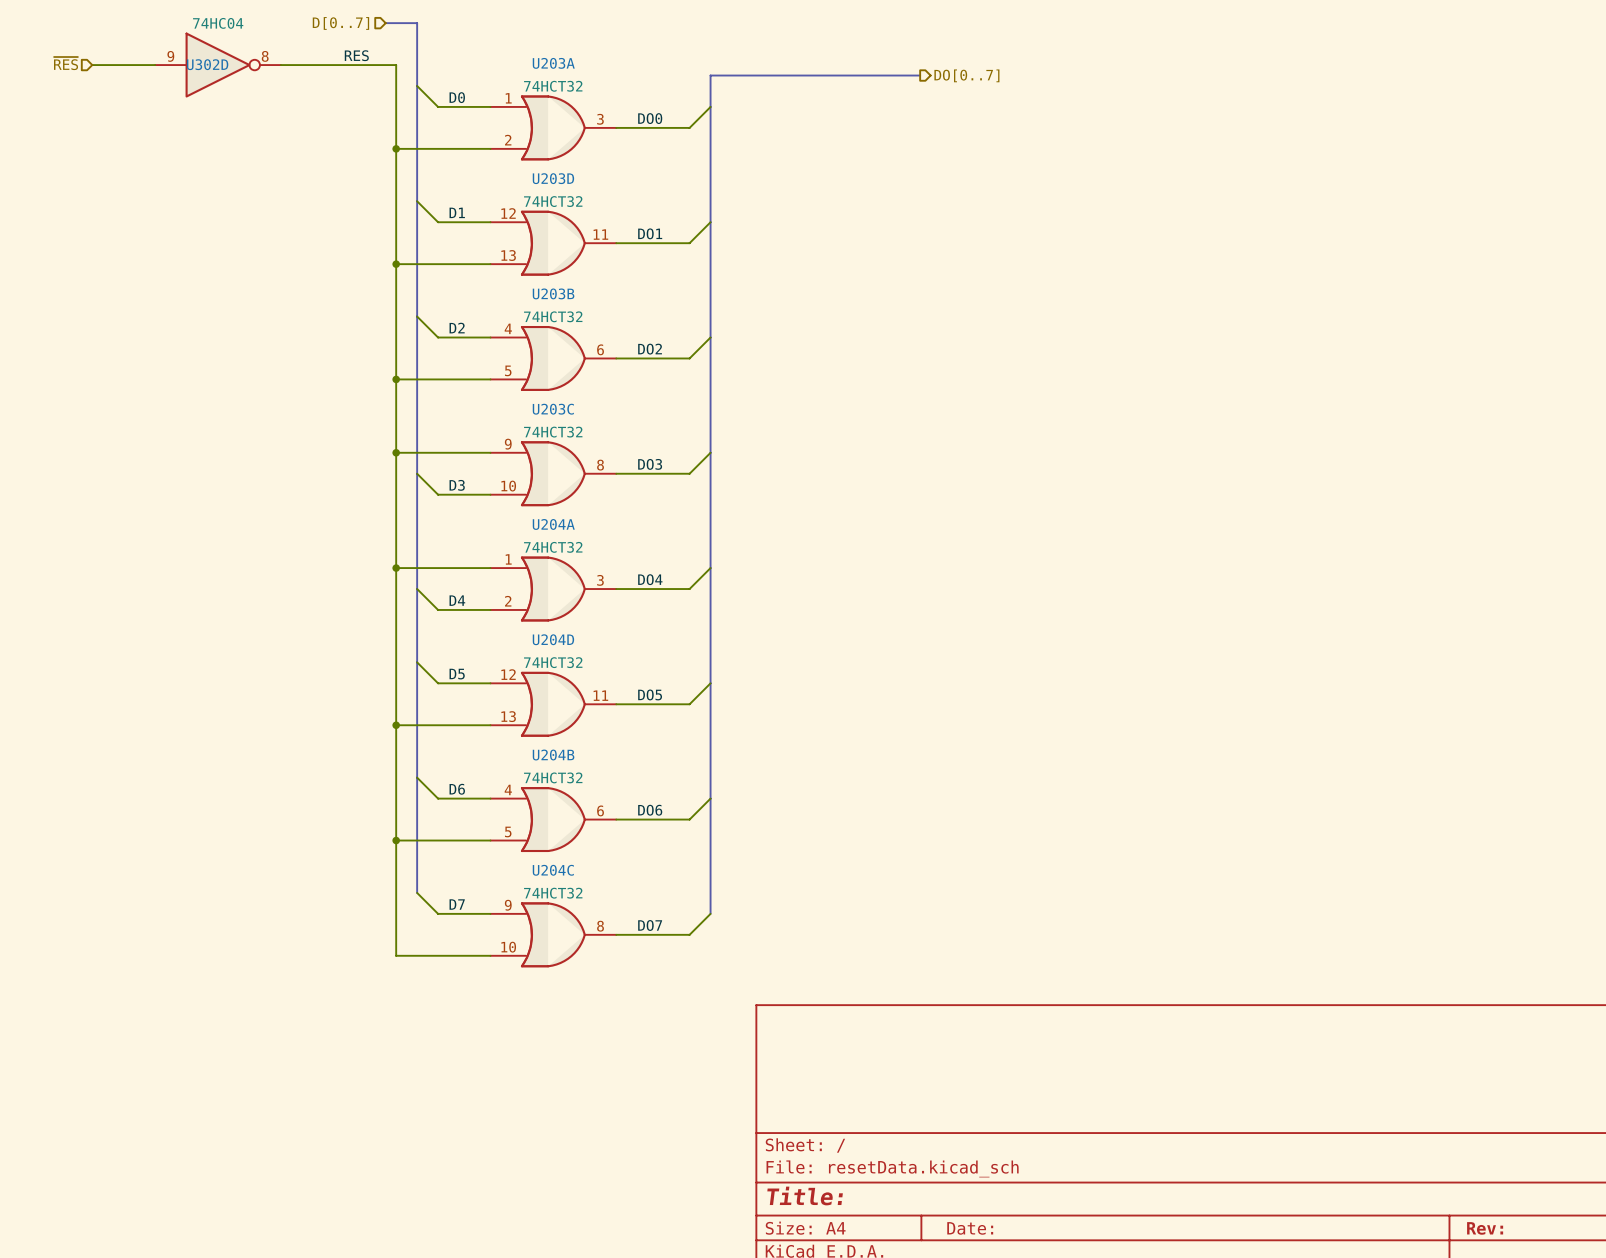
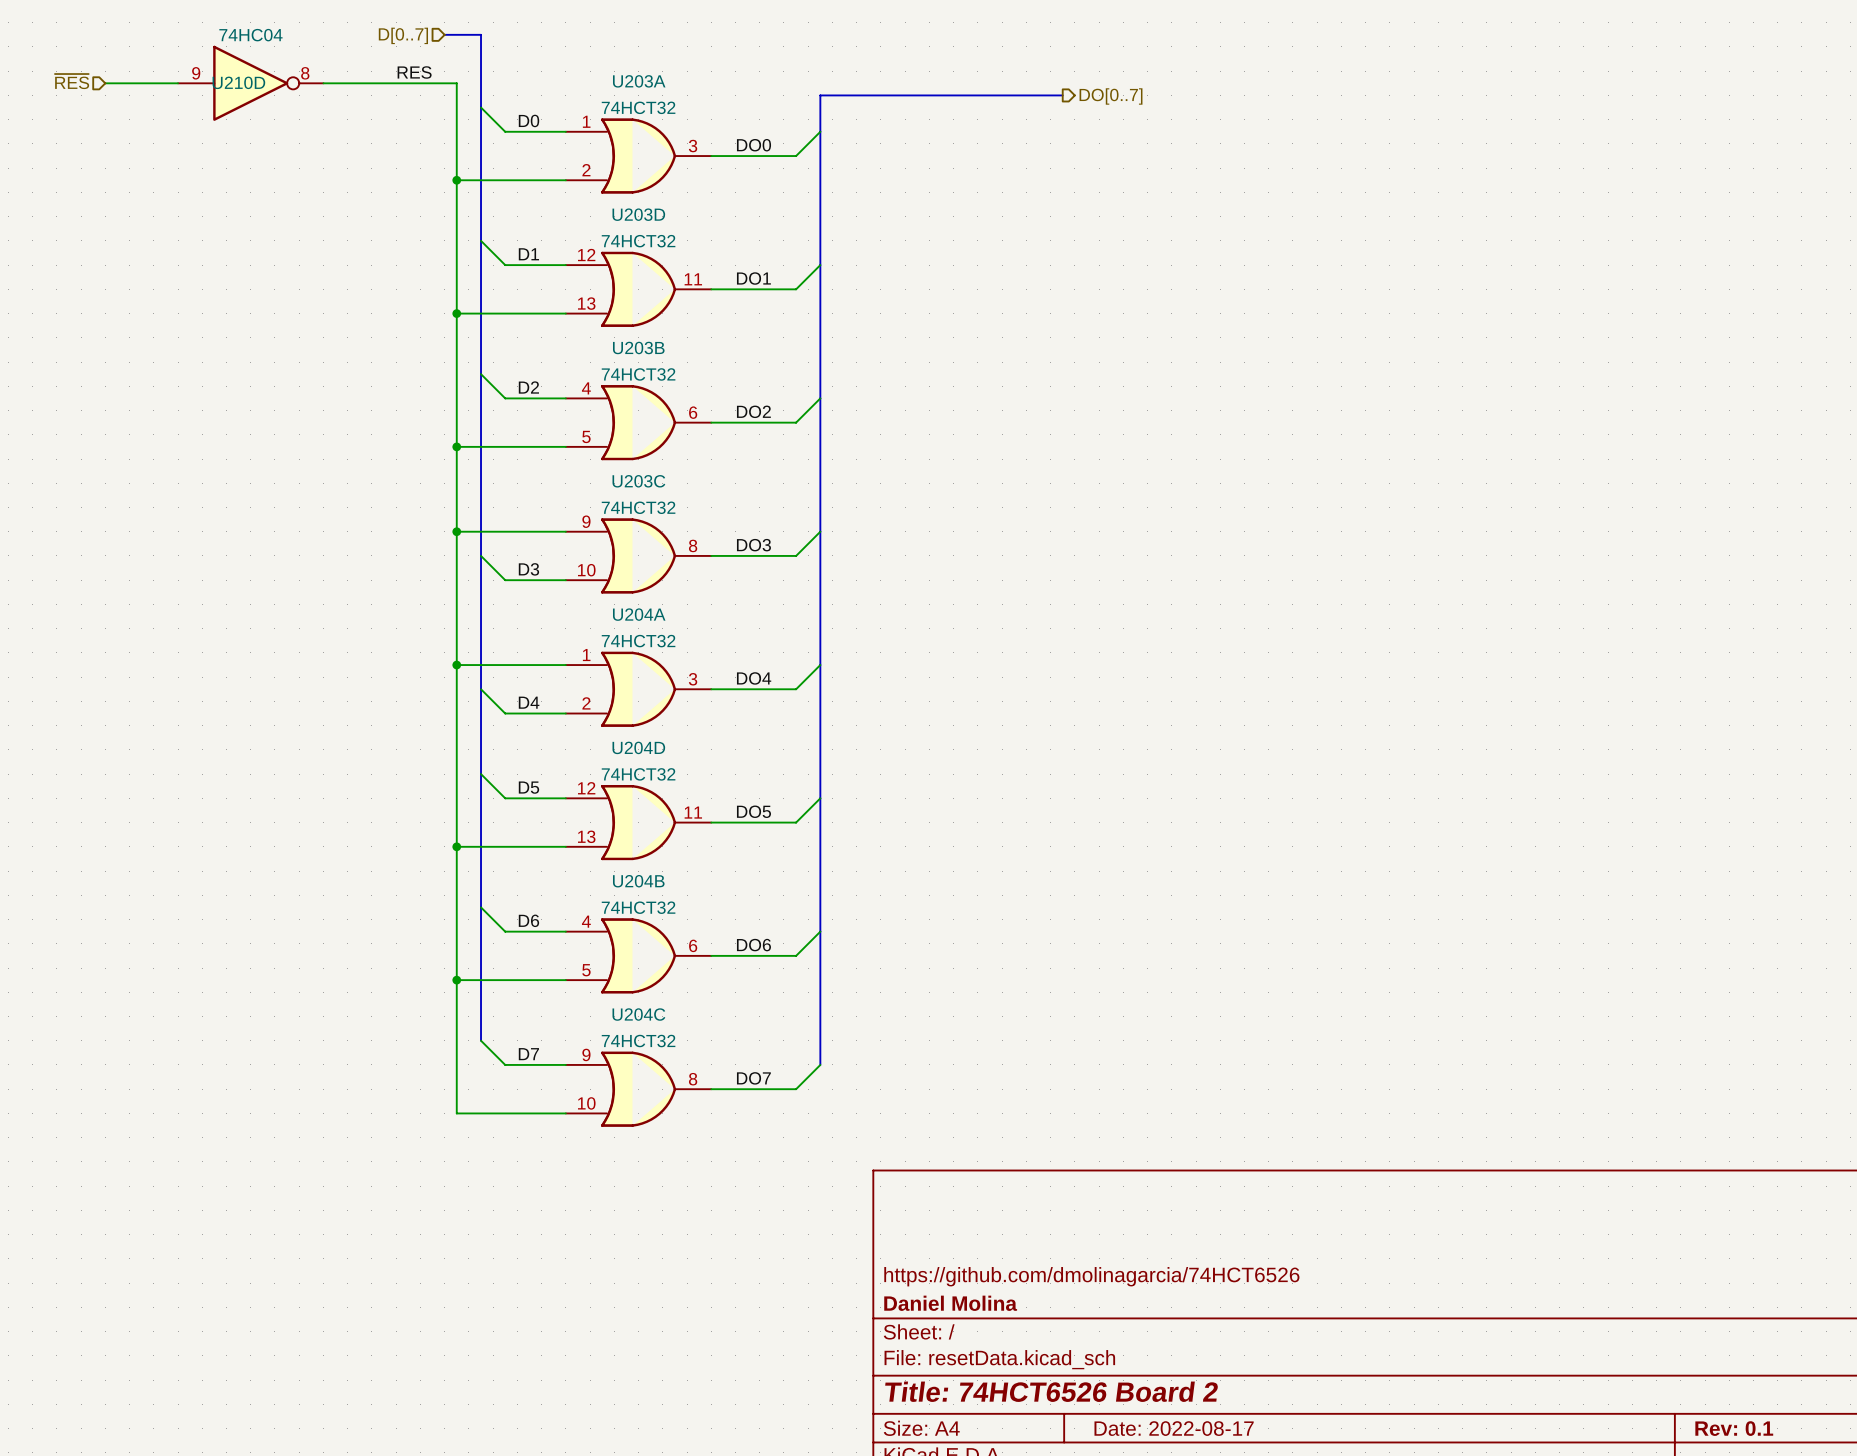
U302D name: U302D (207, 64) -> U210D (238, 82)
title block: none -> https://github.com/dmolinagarcia/74HCT6526 (1091, 1276)
title block: none -> Daniel Molina (950, 1303)
title block: Title: (805, 1195) -> Title: 74HCT6526 Board 2 (1051, 1391)
title block: Date: (970, 1228) -> Date: 2022-08-17 (1174, 1428)
title block: Rev: (1485, 1228) -> Rev: 0.1 (1734, 1428)

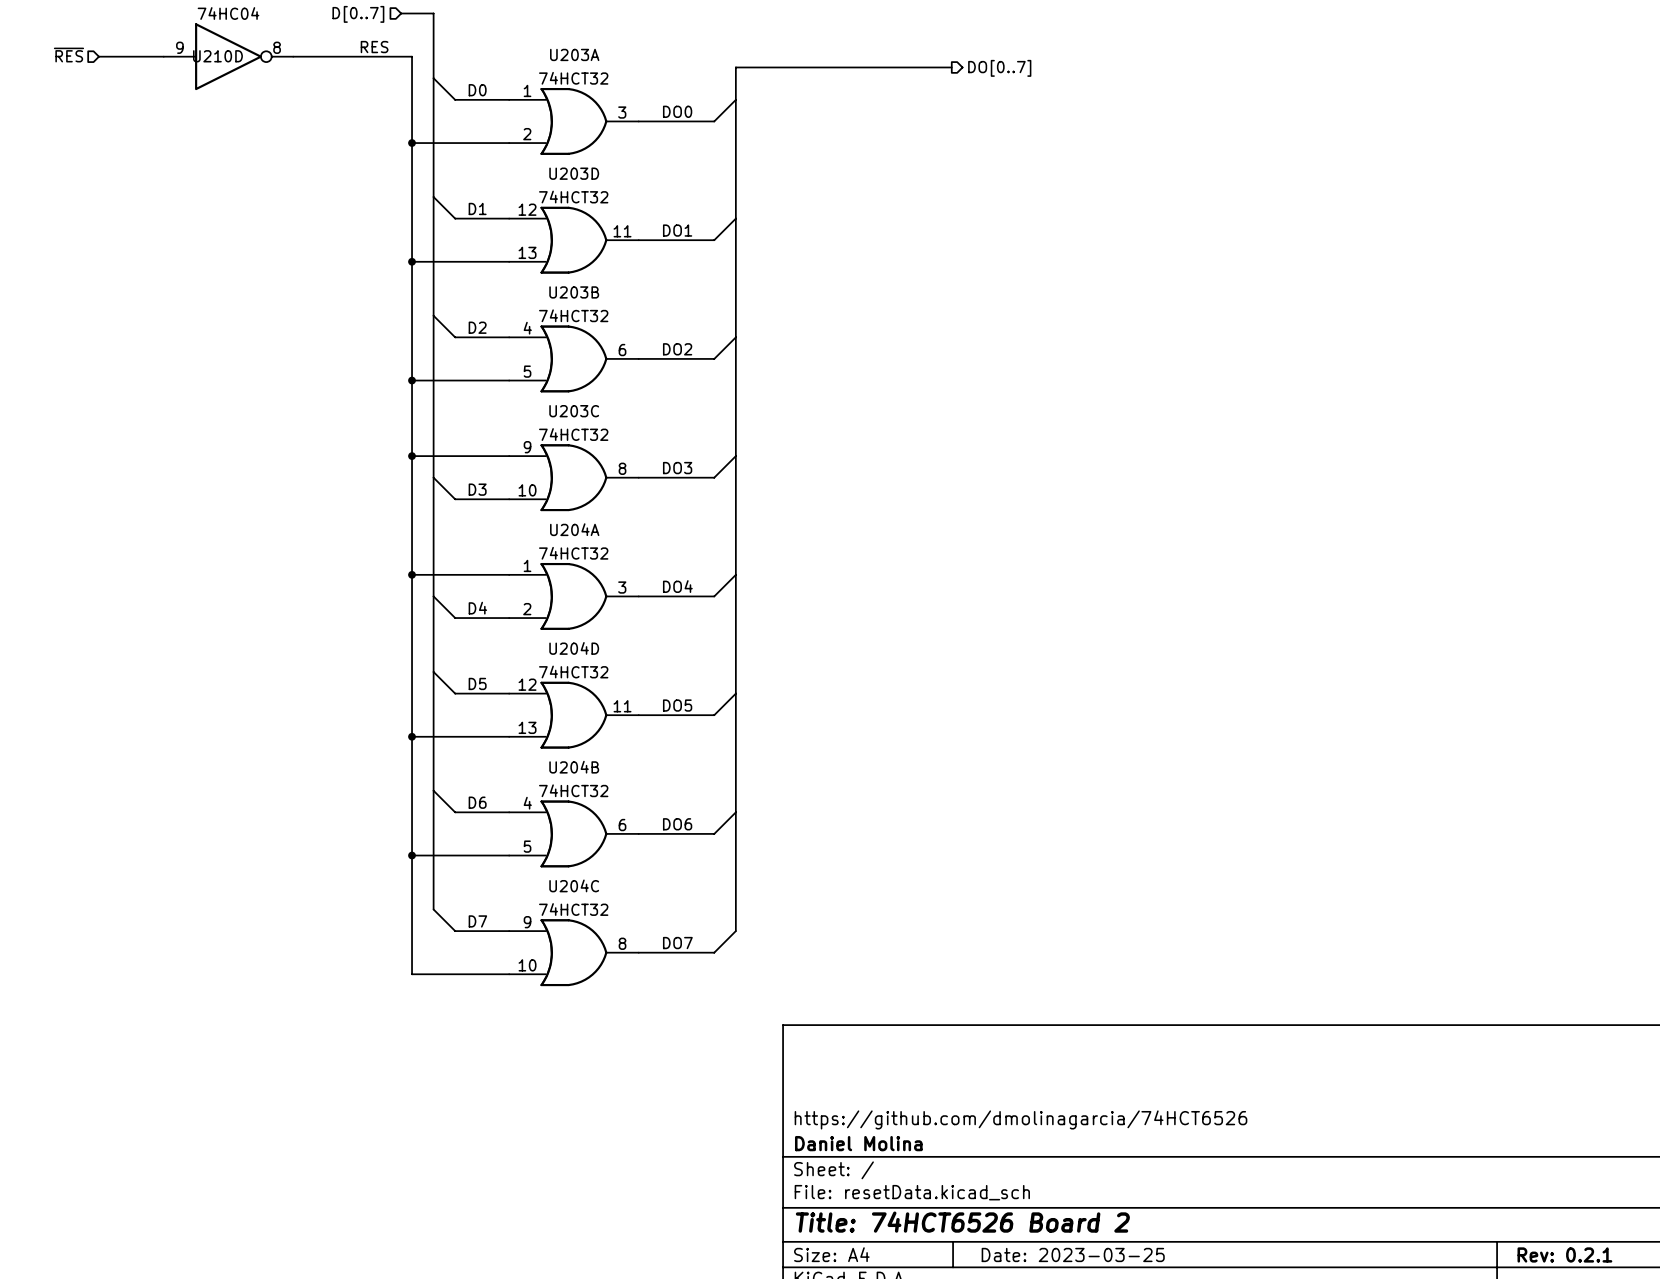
title block: Date: 2022-08-17 (1174, 1428) -> Date: 2023-03-25 (1073, 1254)
title block: Rev: 0.1 (1734, 1428) -> Rev: 0.2.1 (1564, 1254)

